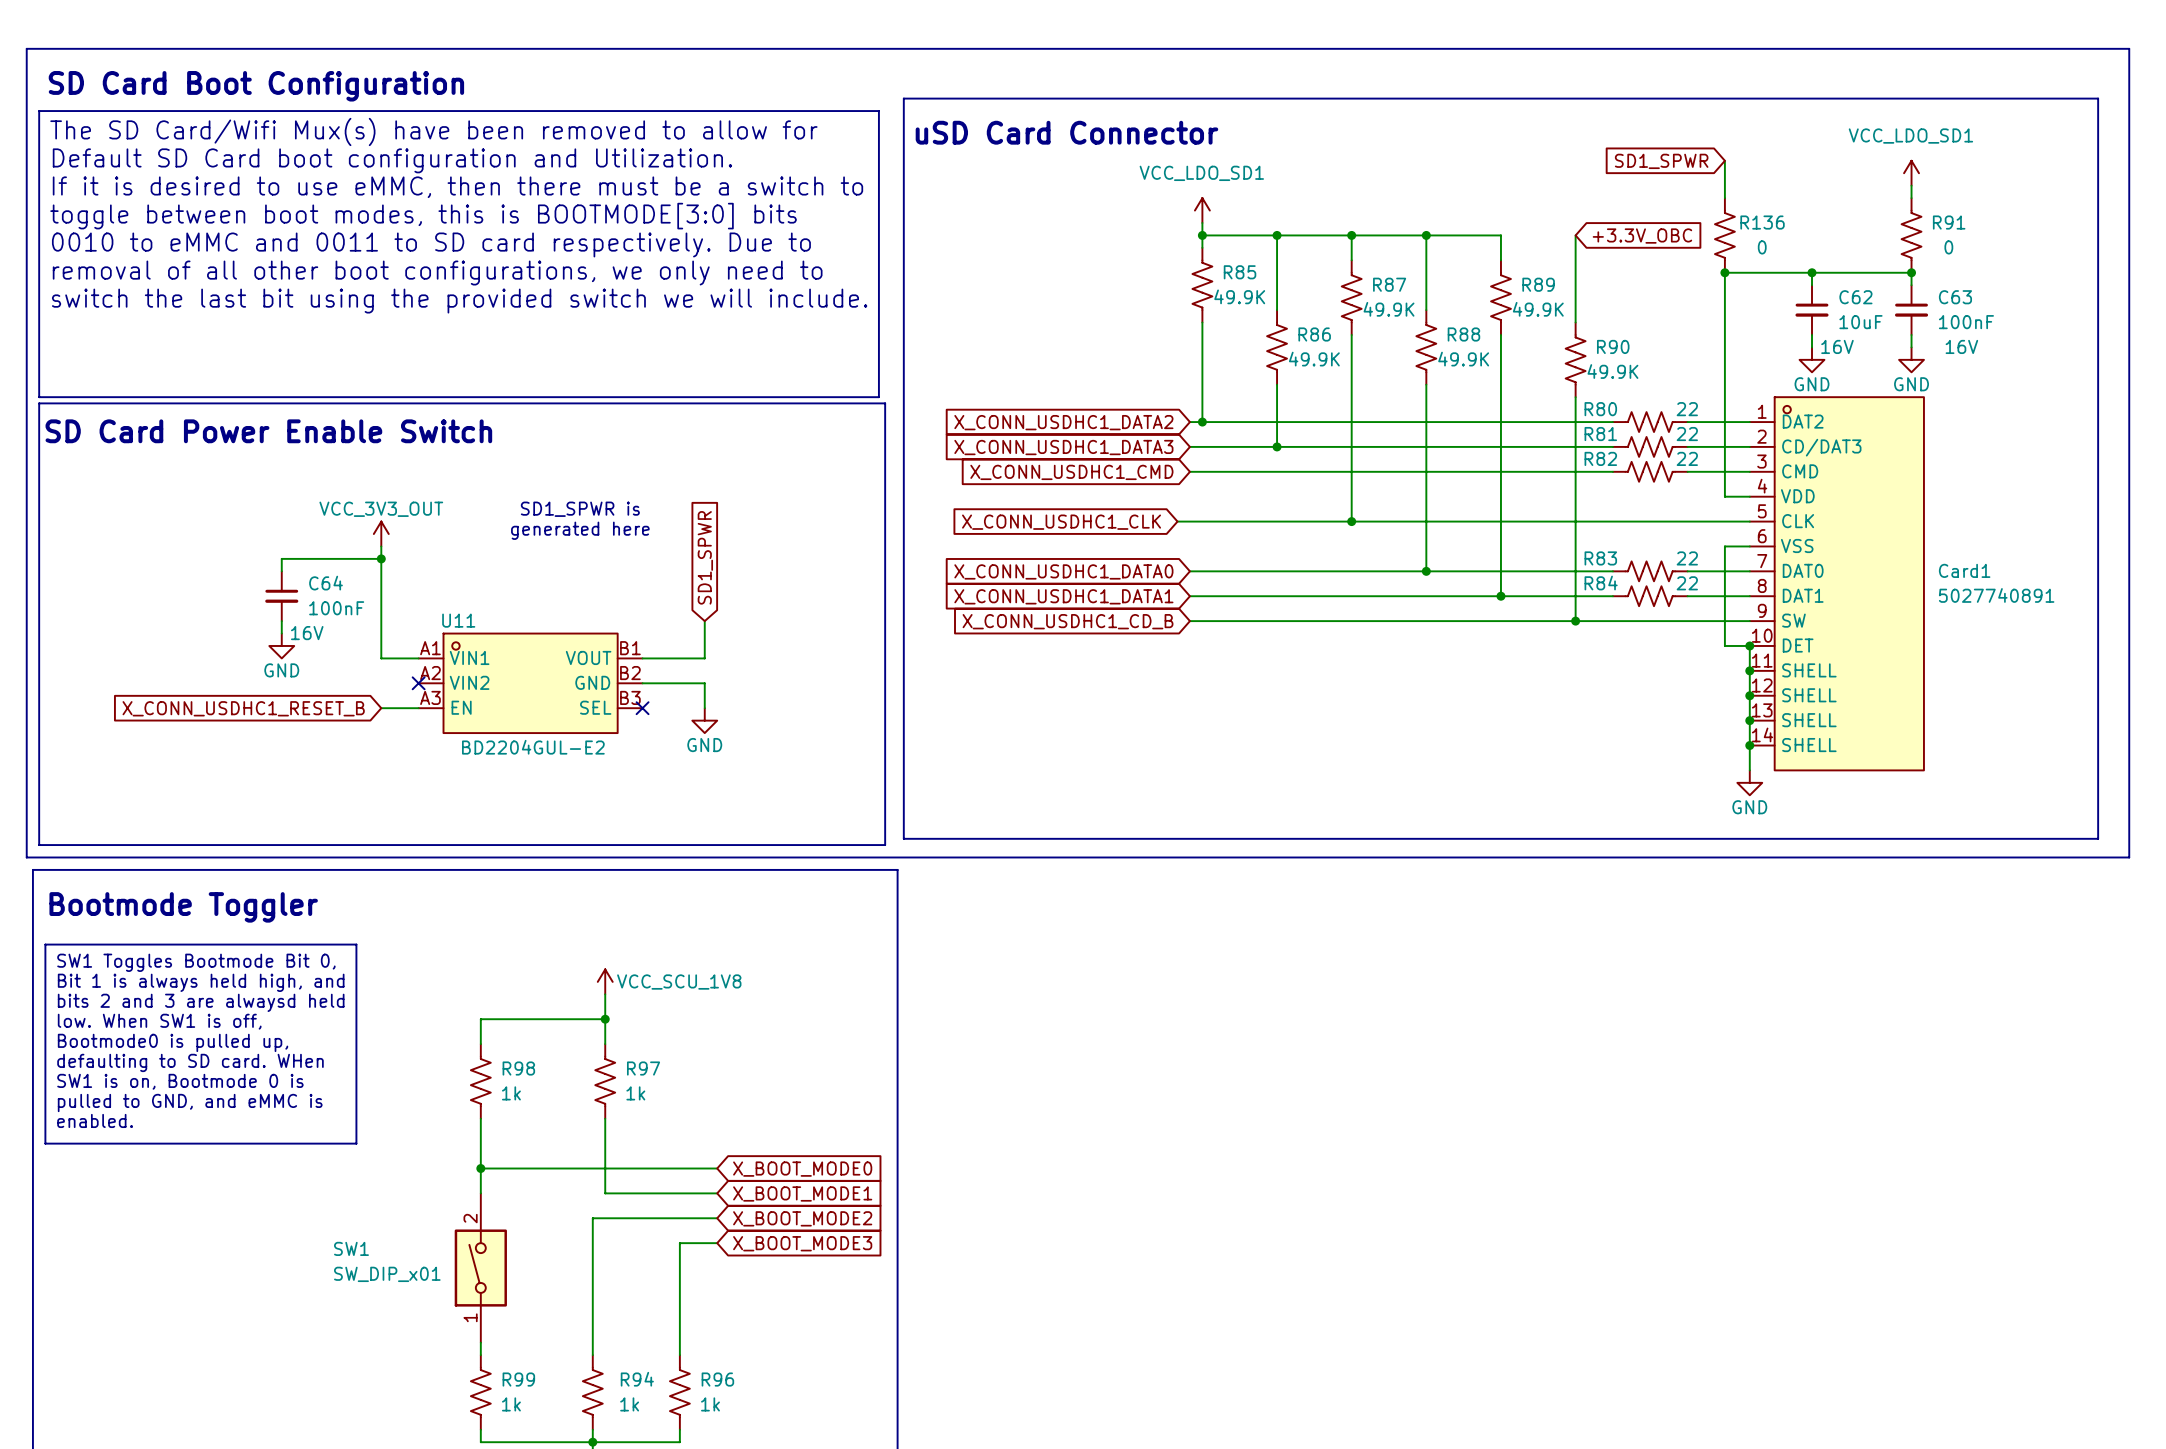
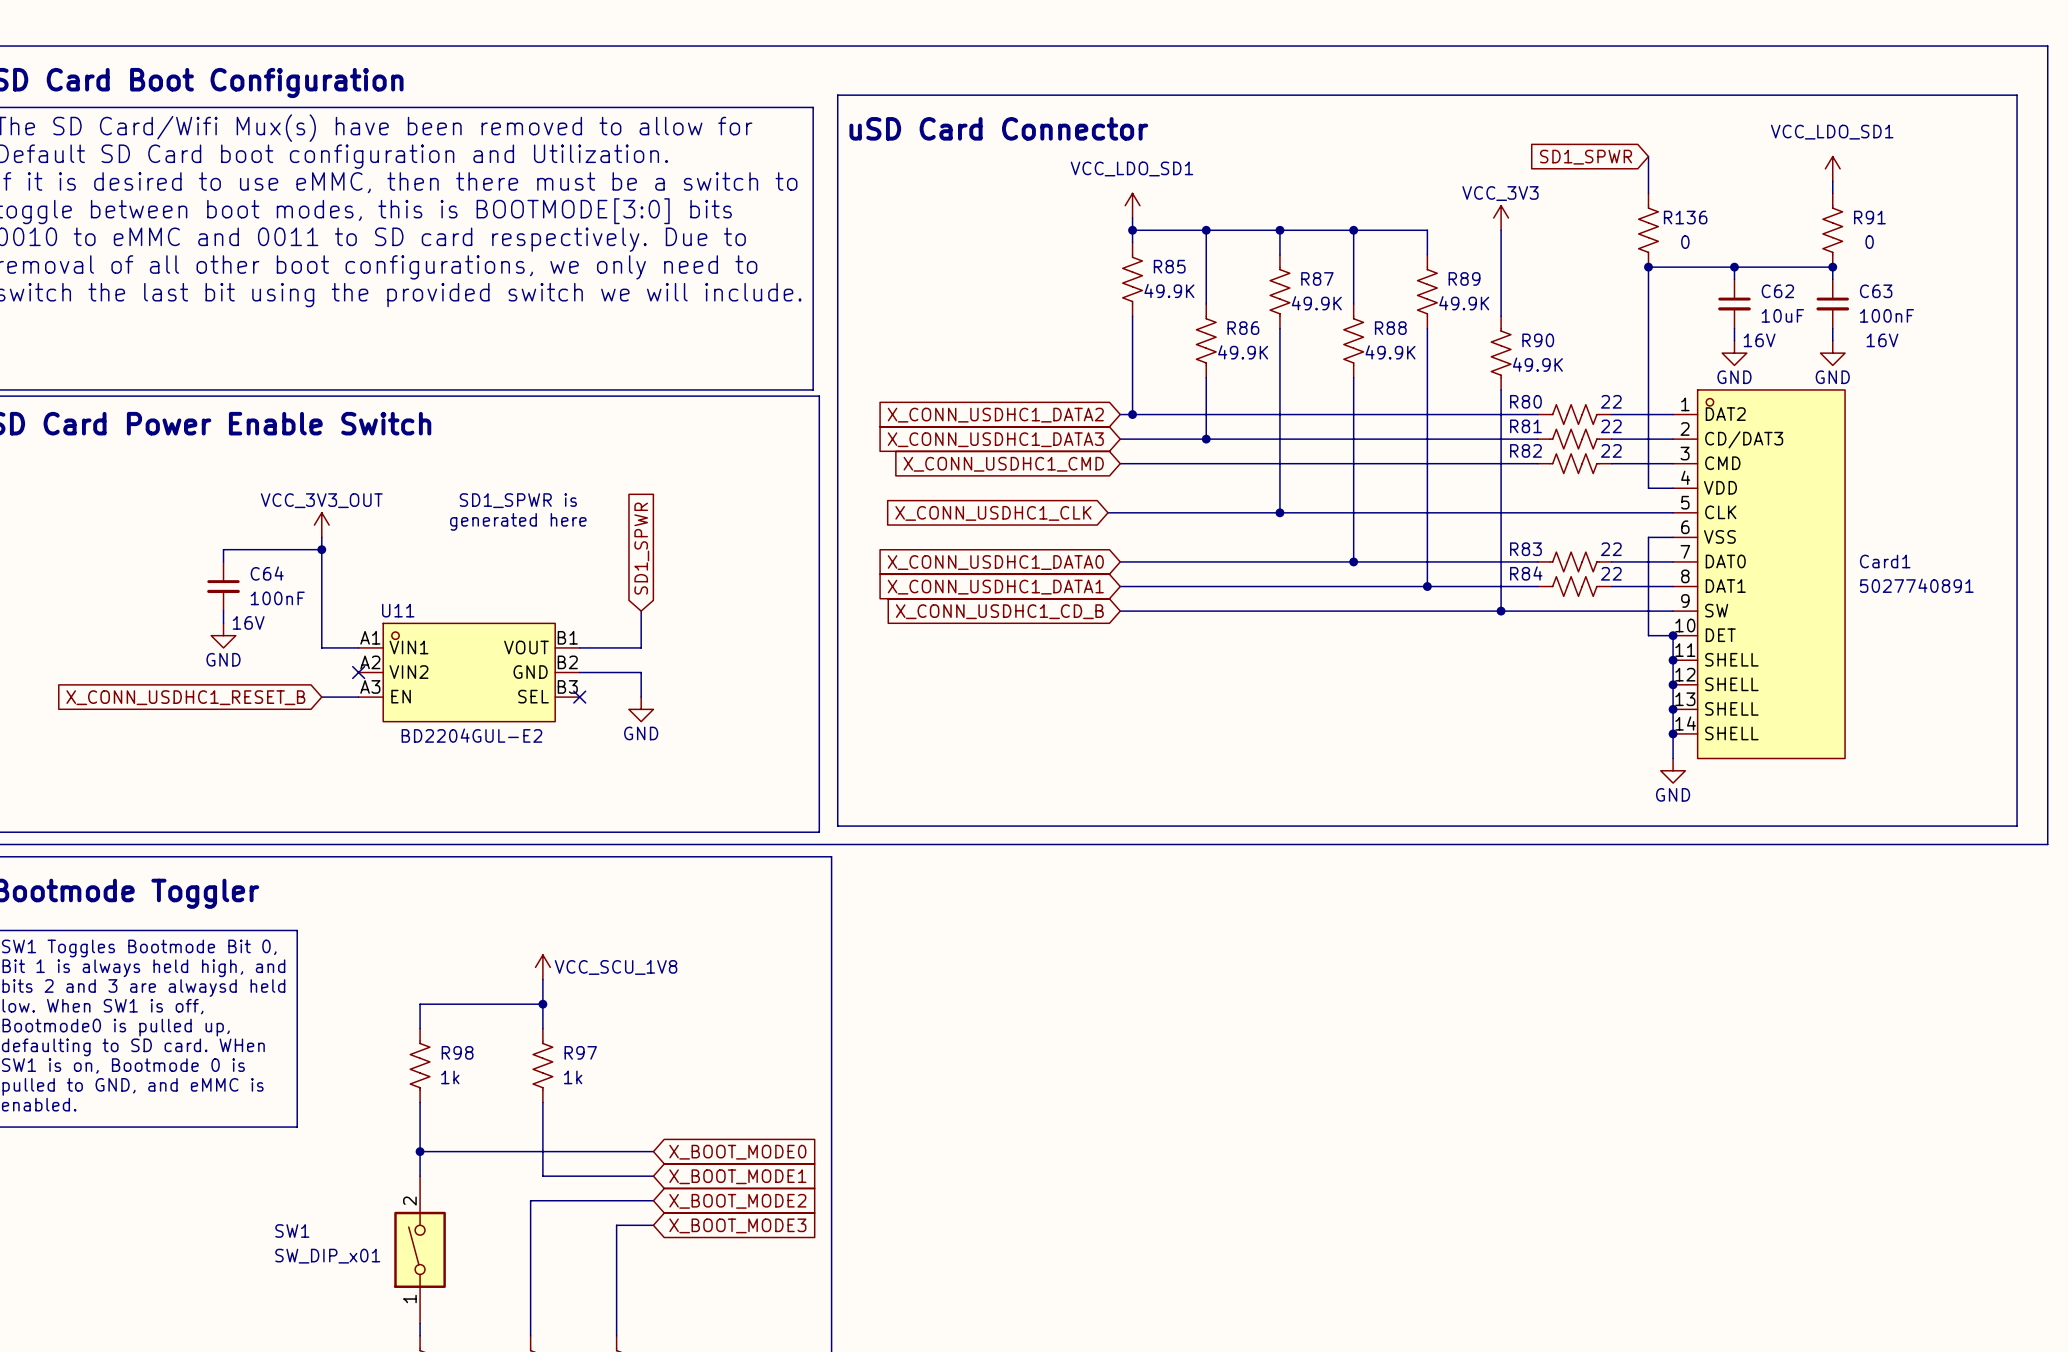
power symbol: none -> VCC_3V3 (1501, 218)
global label: +3.3V_OBC (1642, 236) -> none

